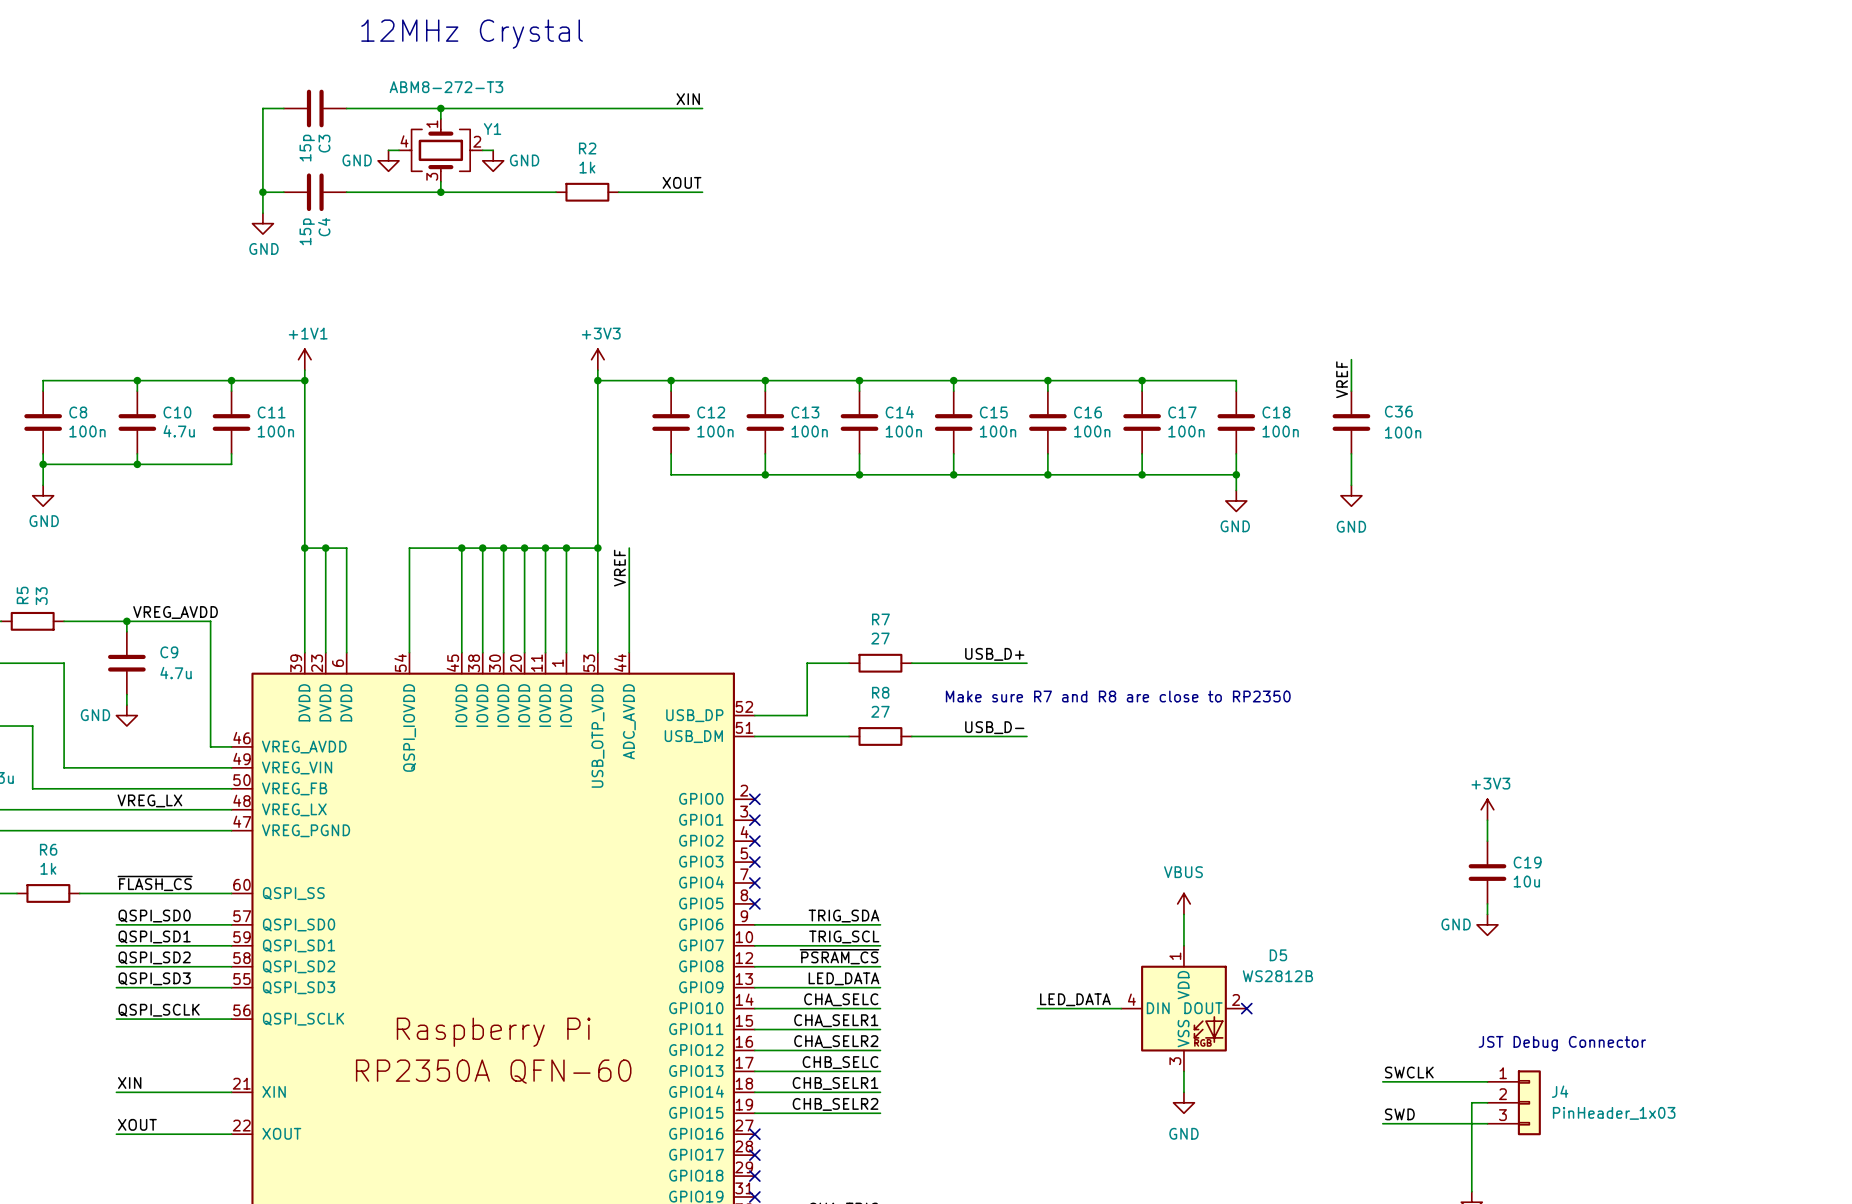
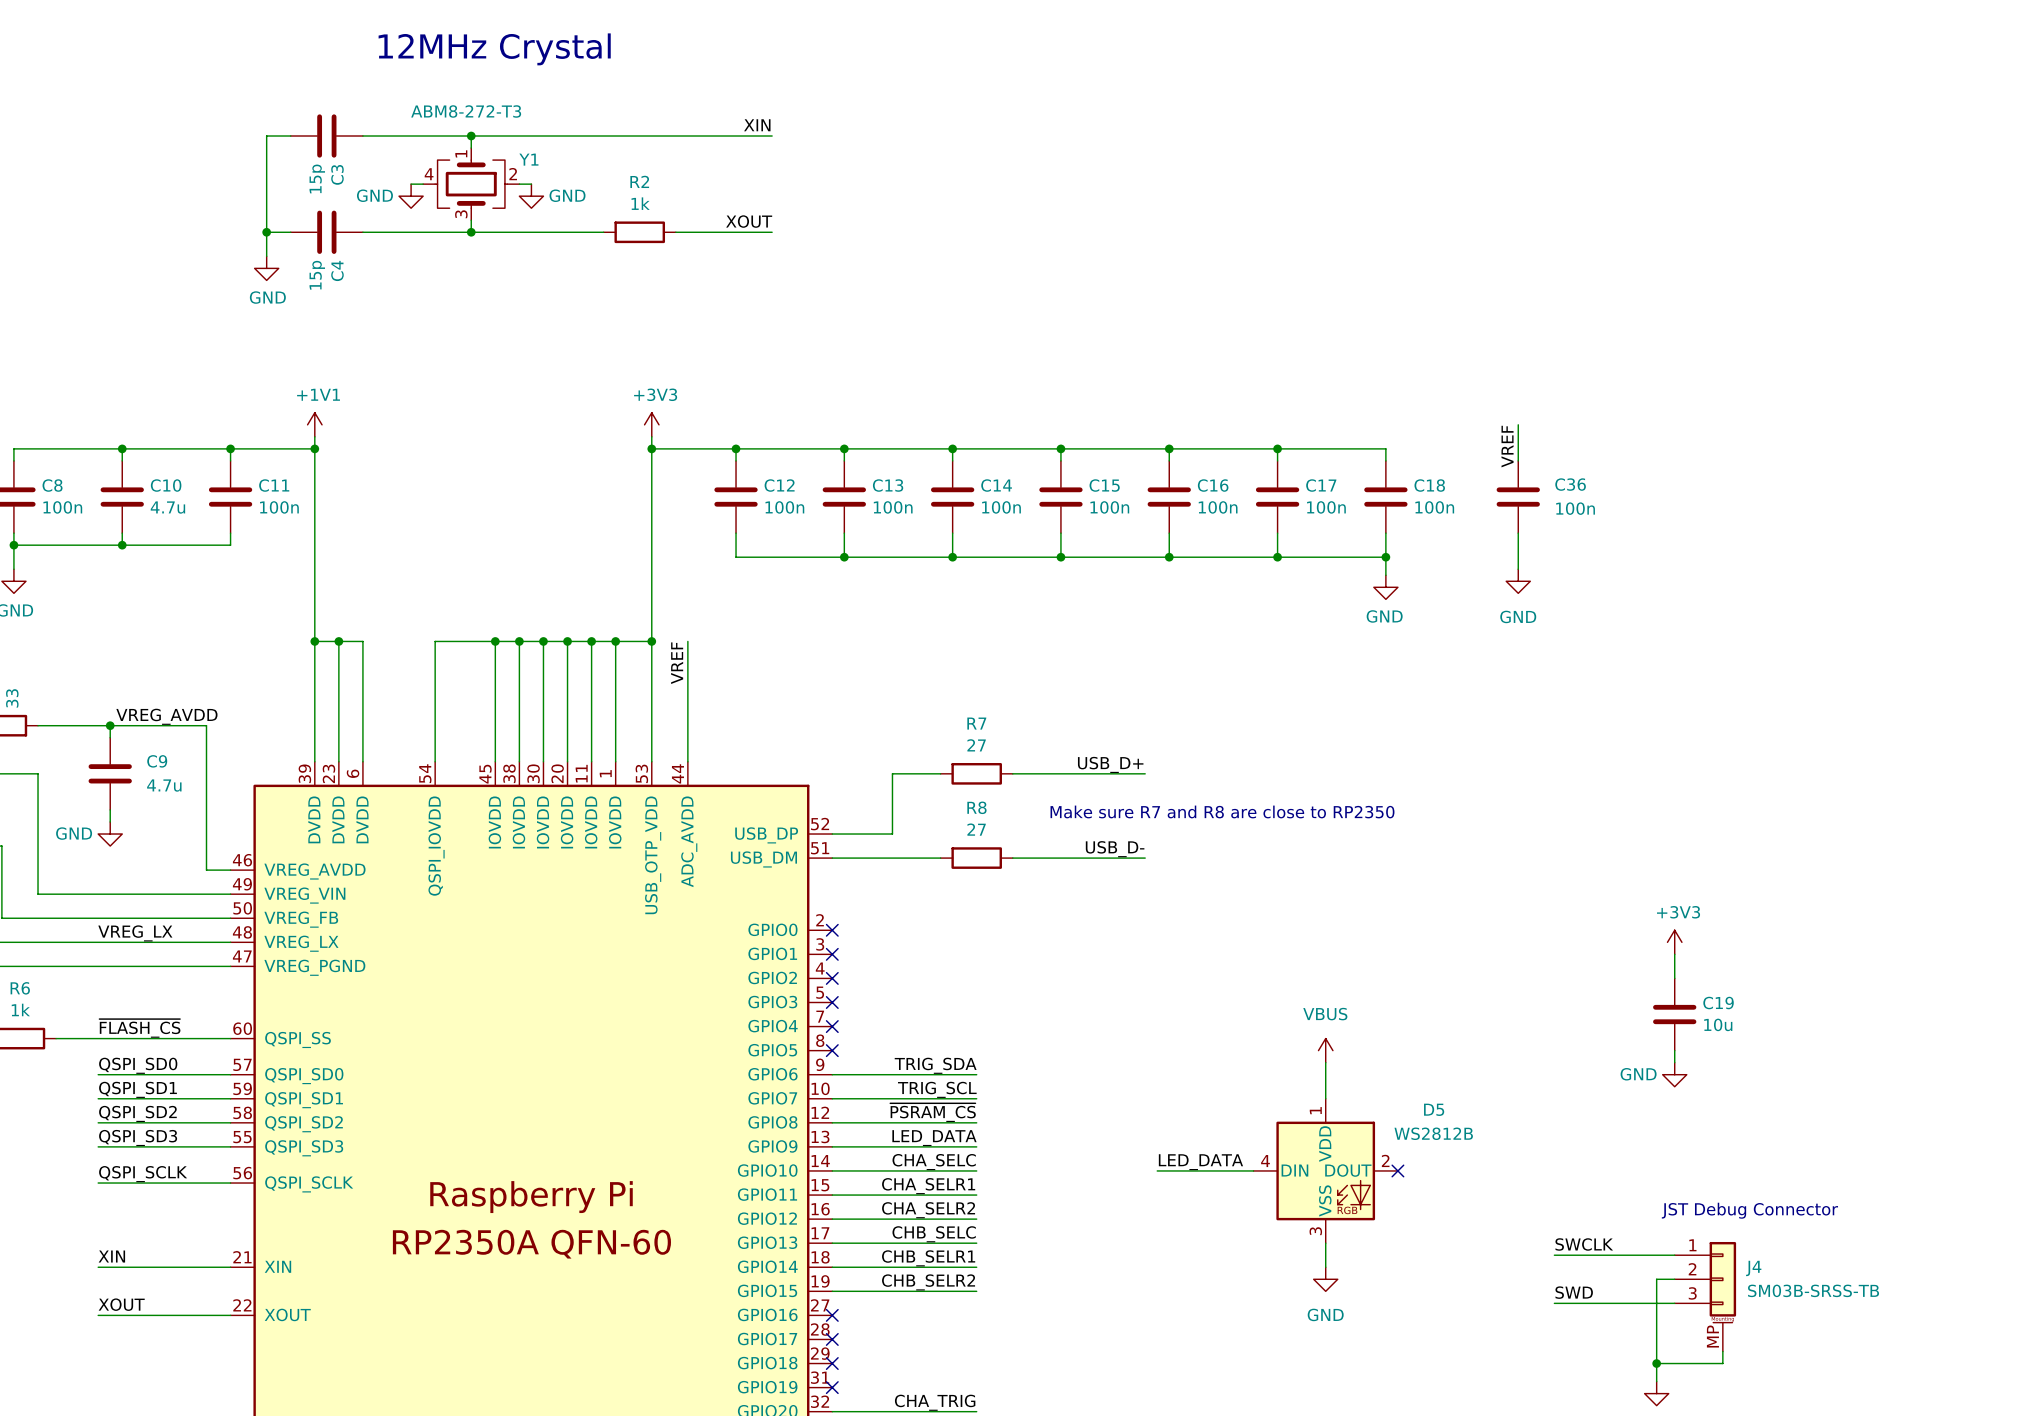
J4 symbol: [1487, 1070, 1541, 1136] -> [1674, 1241, 1737, 1352]
J4 value: PinHeader_1x03 (1614, 1113) -> SM03B-SRSS-TB (1813, 1290)
wire: none -> (1722, 1351) (1722, 1363) (1656, 1363)
junction: none -> (1656, 1363)

